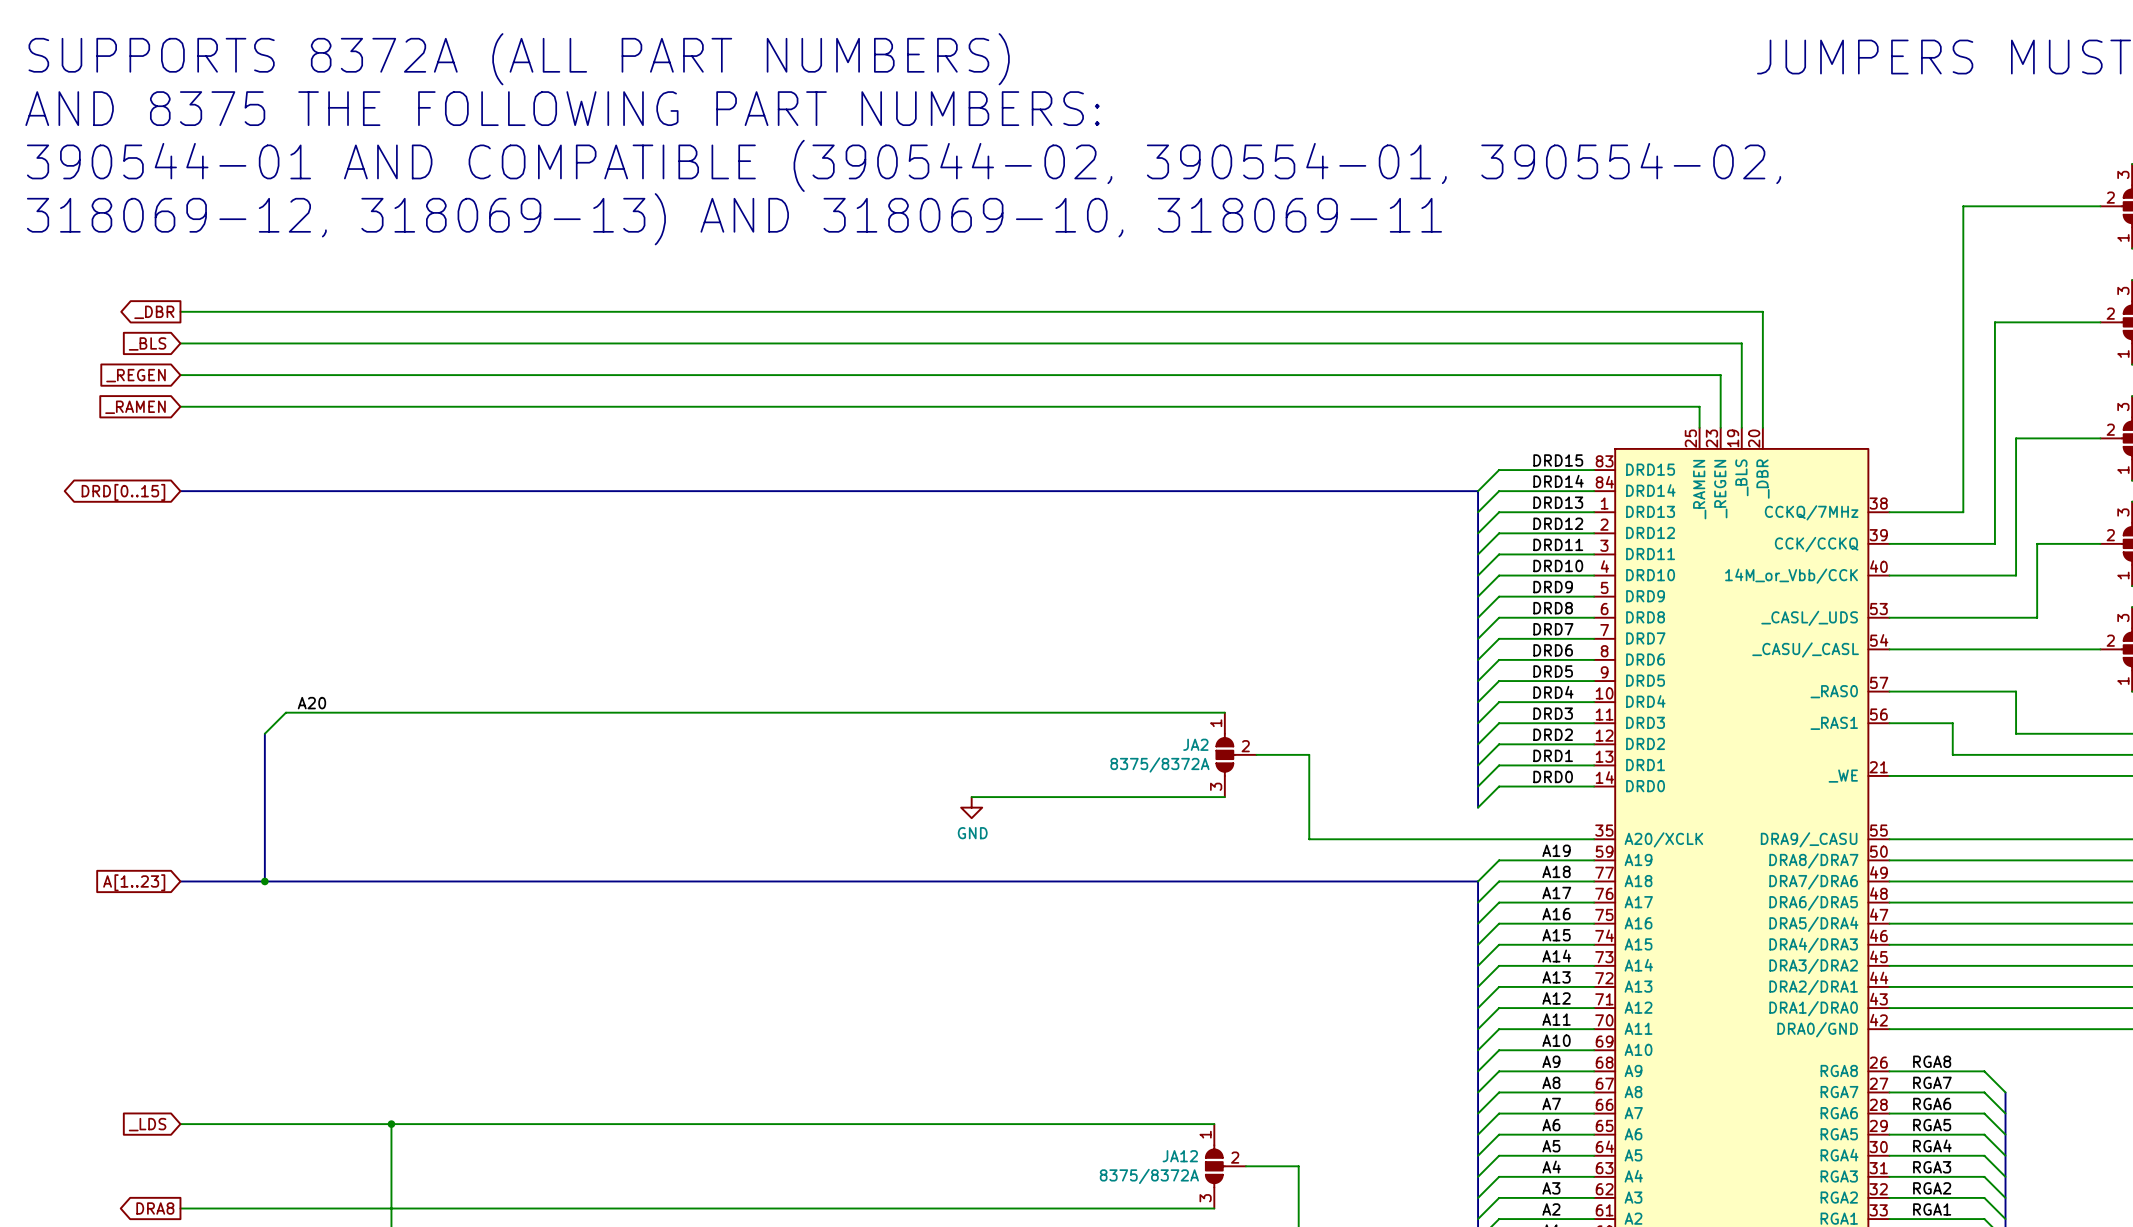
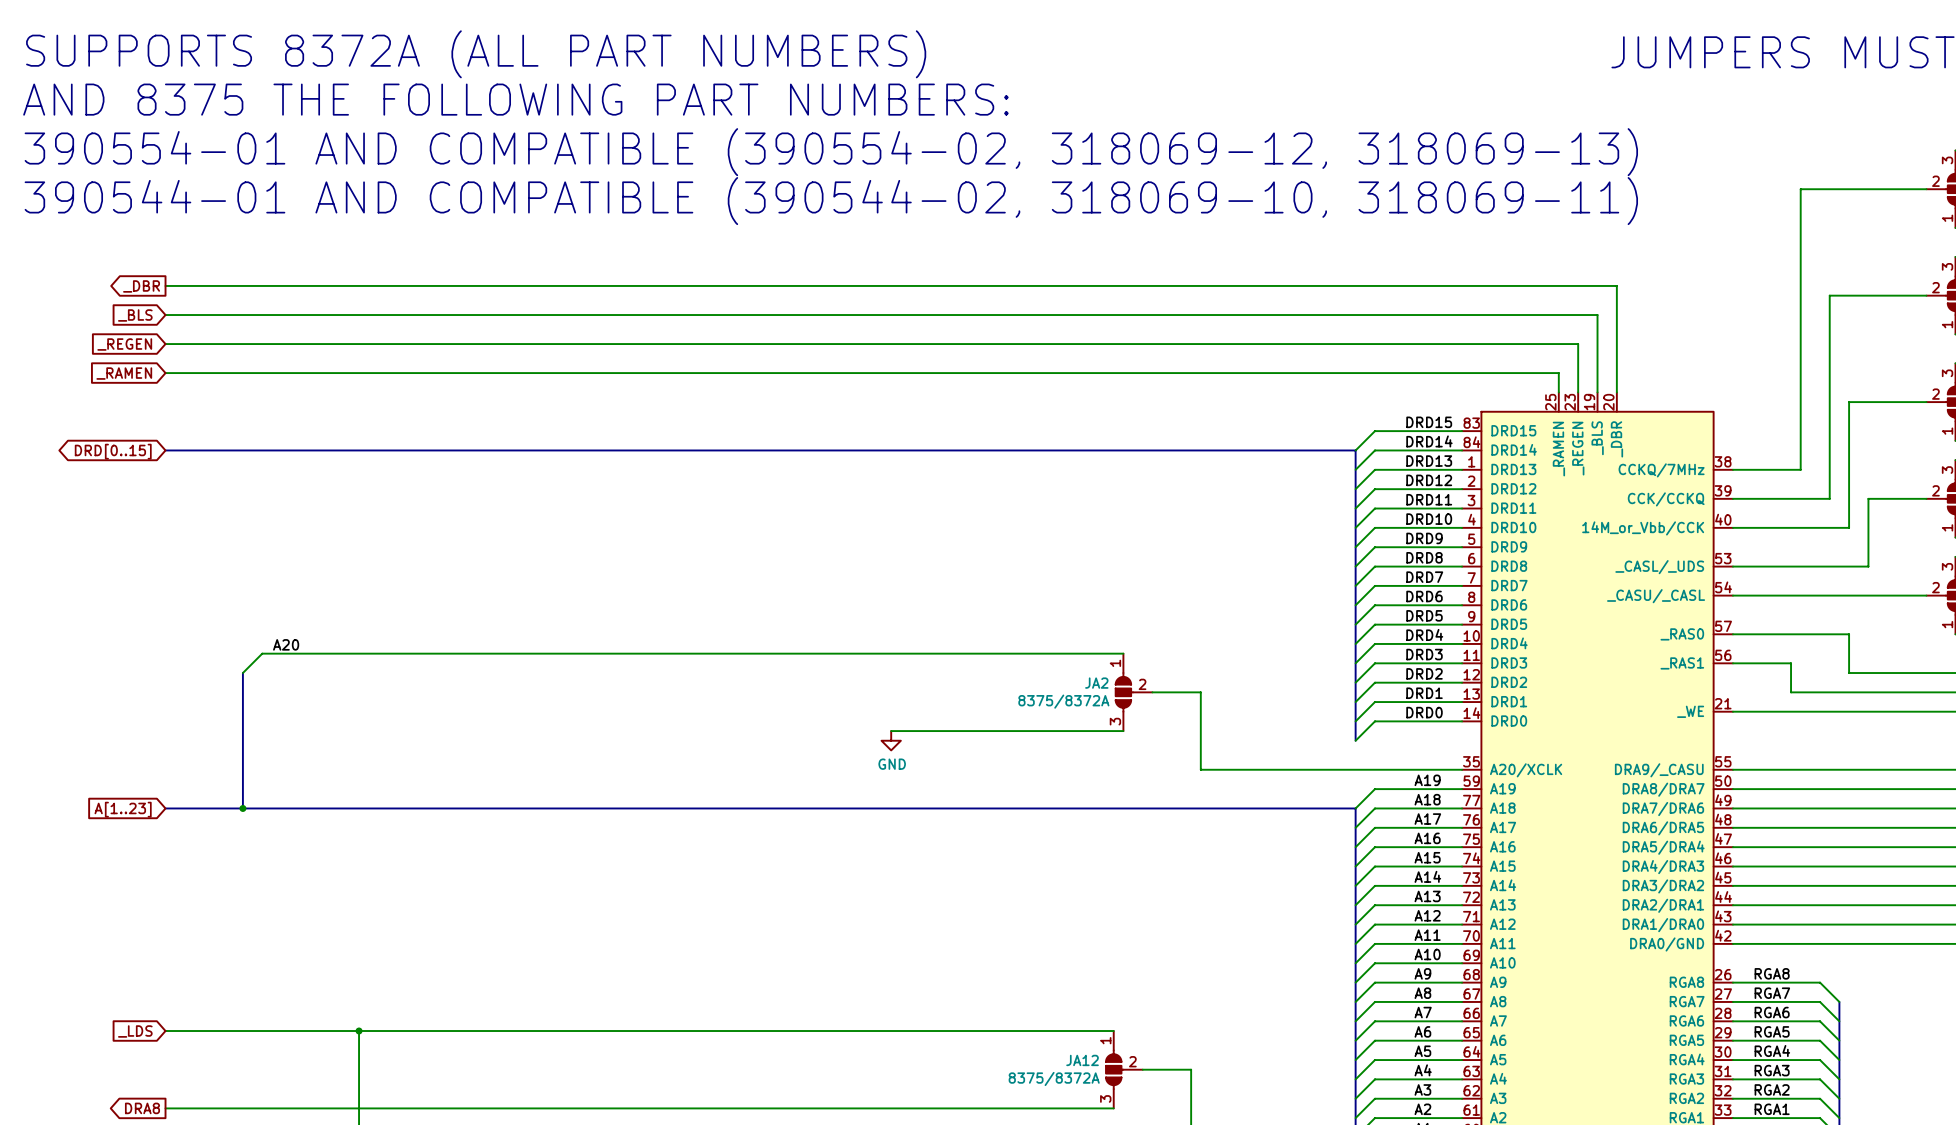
text: 390544-01 AND COMPATIBLE (390544-02, 390554-01, 390554-02, (904, 165) -> 390554-01 AND COMPATIBLE (390554-02, 318069-12, 318069-13) (831, 152)
text: 318069-12, 318069-13) AND 318069-10, 318069-11 (734, 219) -> 390544-01 AND COMPATIBLE (390544-02, 318069-10, 318069-11) (831, 201)

